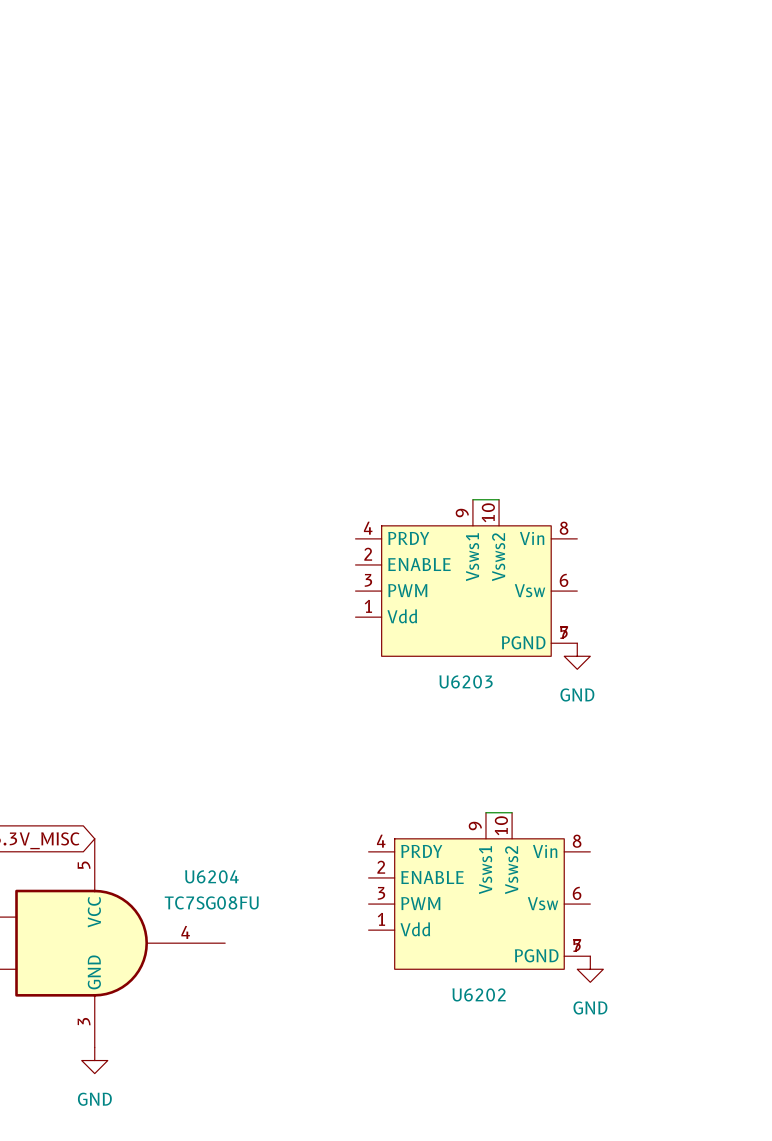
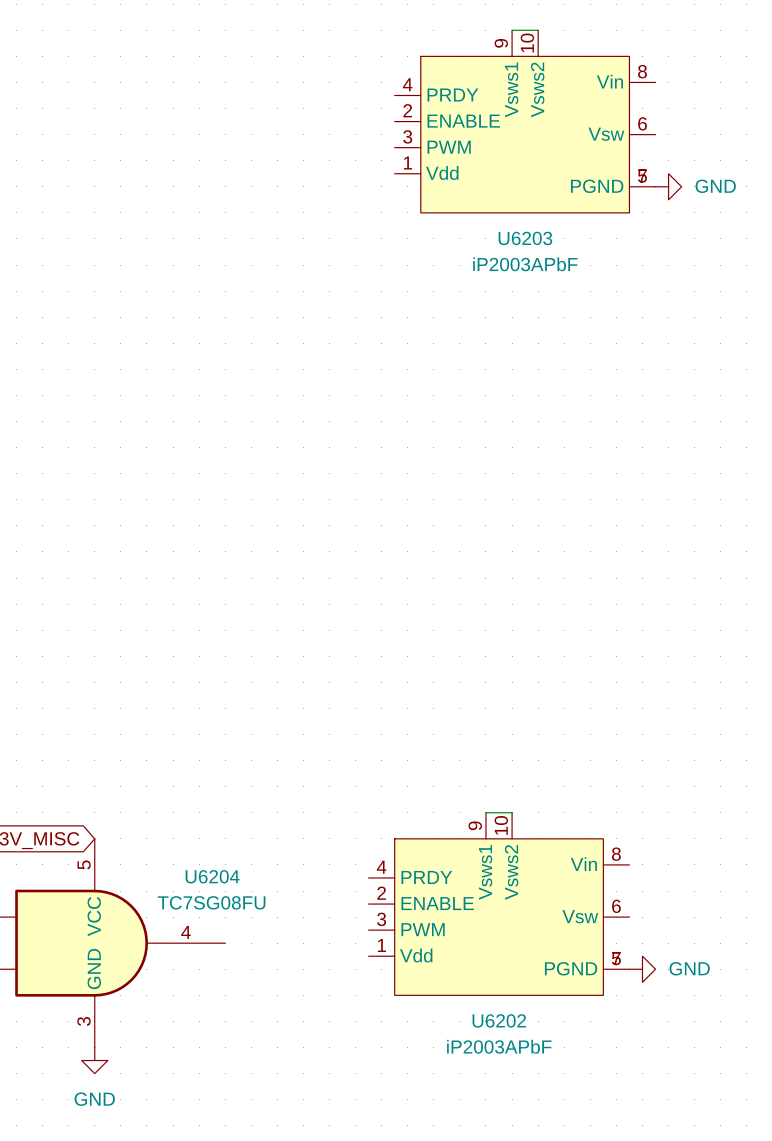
wire: none -> (512, 30) (538, 30)
power symbol: none -> GND (668, 186)
U6203 value: none -> iP2003APbF (525, 264)
U6203 symbol: [355, 499, 578, 657] -> [394, 30, 656, 213]
wire: (472, 499) (499, 499) -> none
power symbol: GND (577, 656) -> none
U6202 symbol: [368, 812, 591, 970] -> [368, 812, 630, 996]
power symbol rotation: 0° (590, 969) -> 90° counterclockwise (642, 969)
power symbol position: GND (590, 969) -> GND (642, 969)
U6202 value: none -> iP2003APbF (499, 1046)

